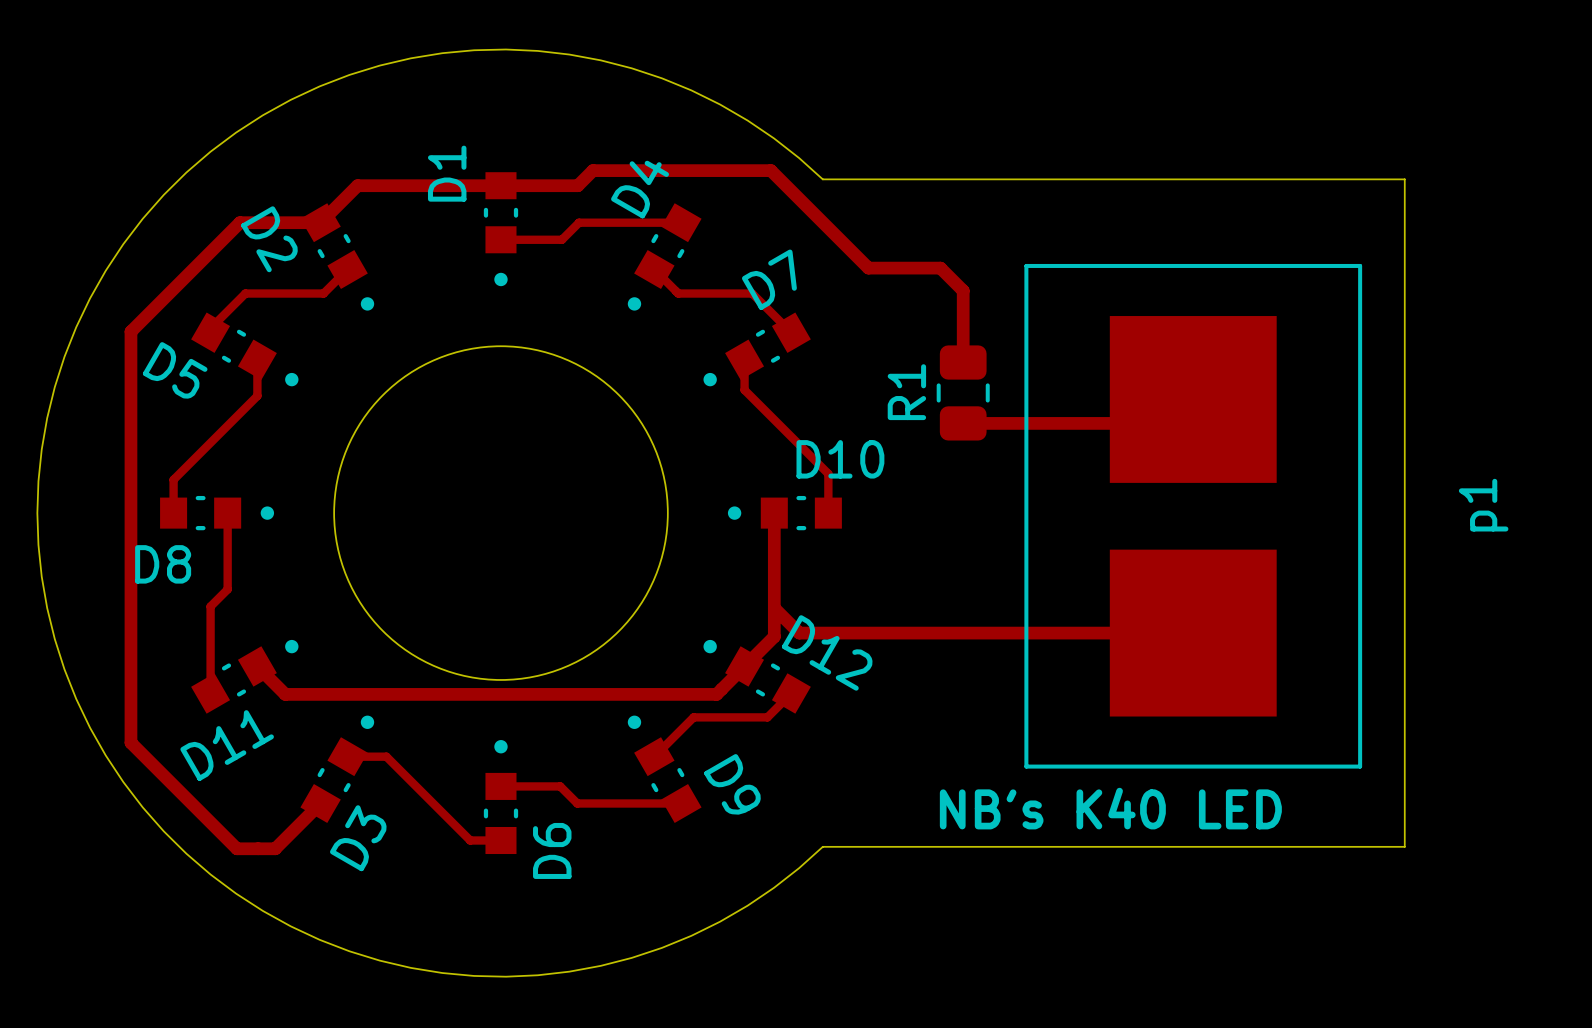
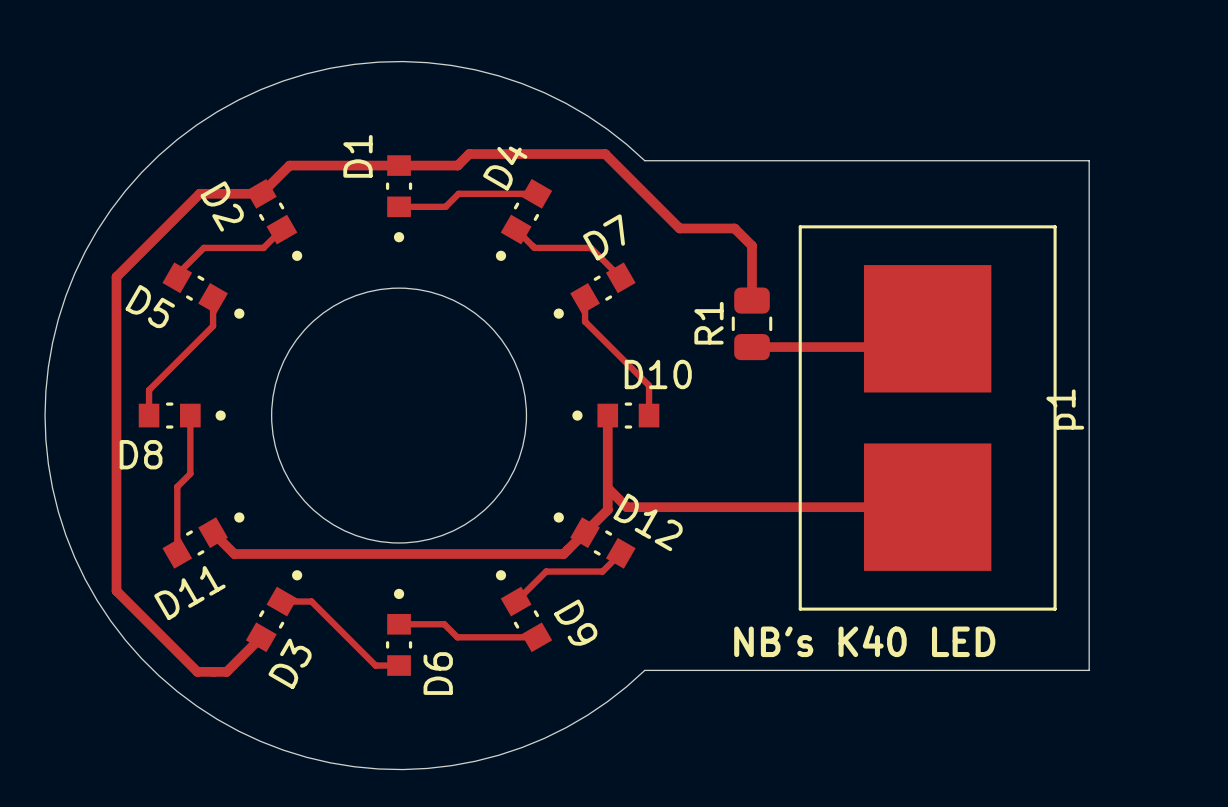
p1 name position: p1 (1483, 505) -> p1 (1065, 409)

